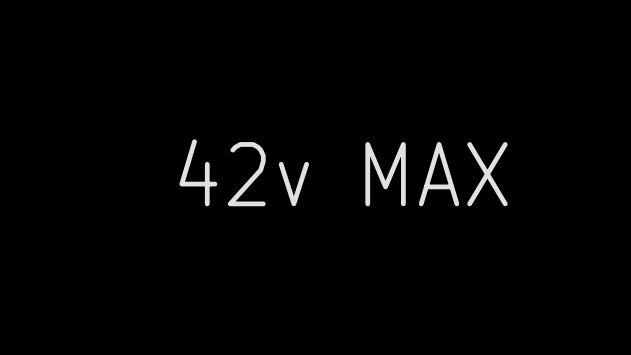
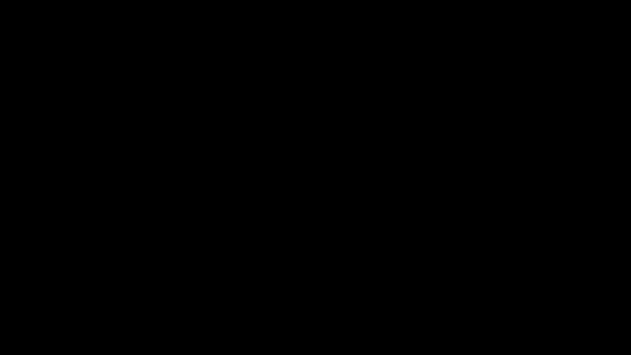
text: 42v MAX (343, 172) -> none

